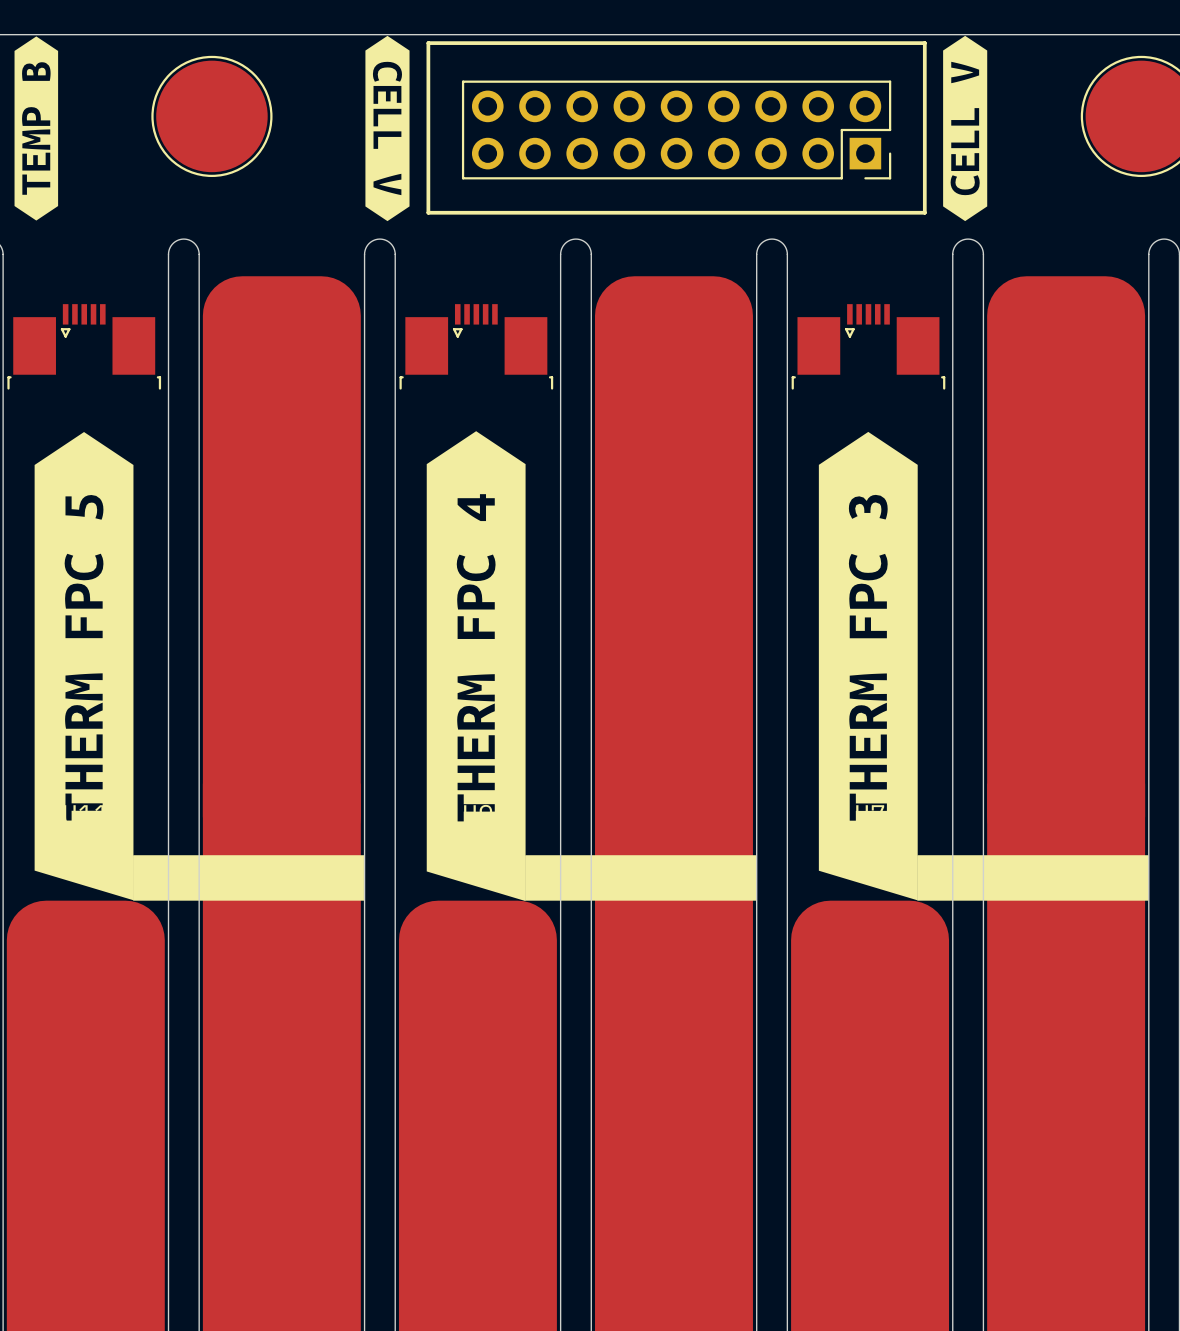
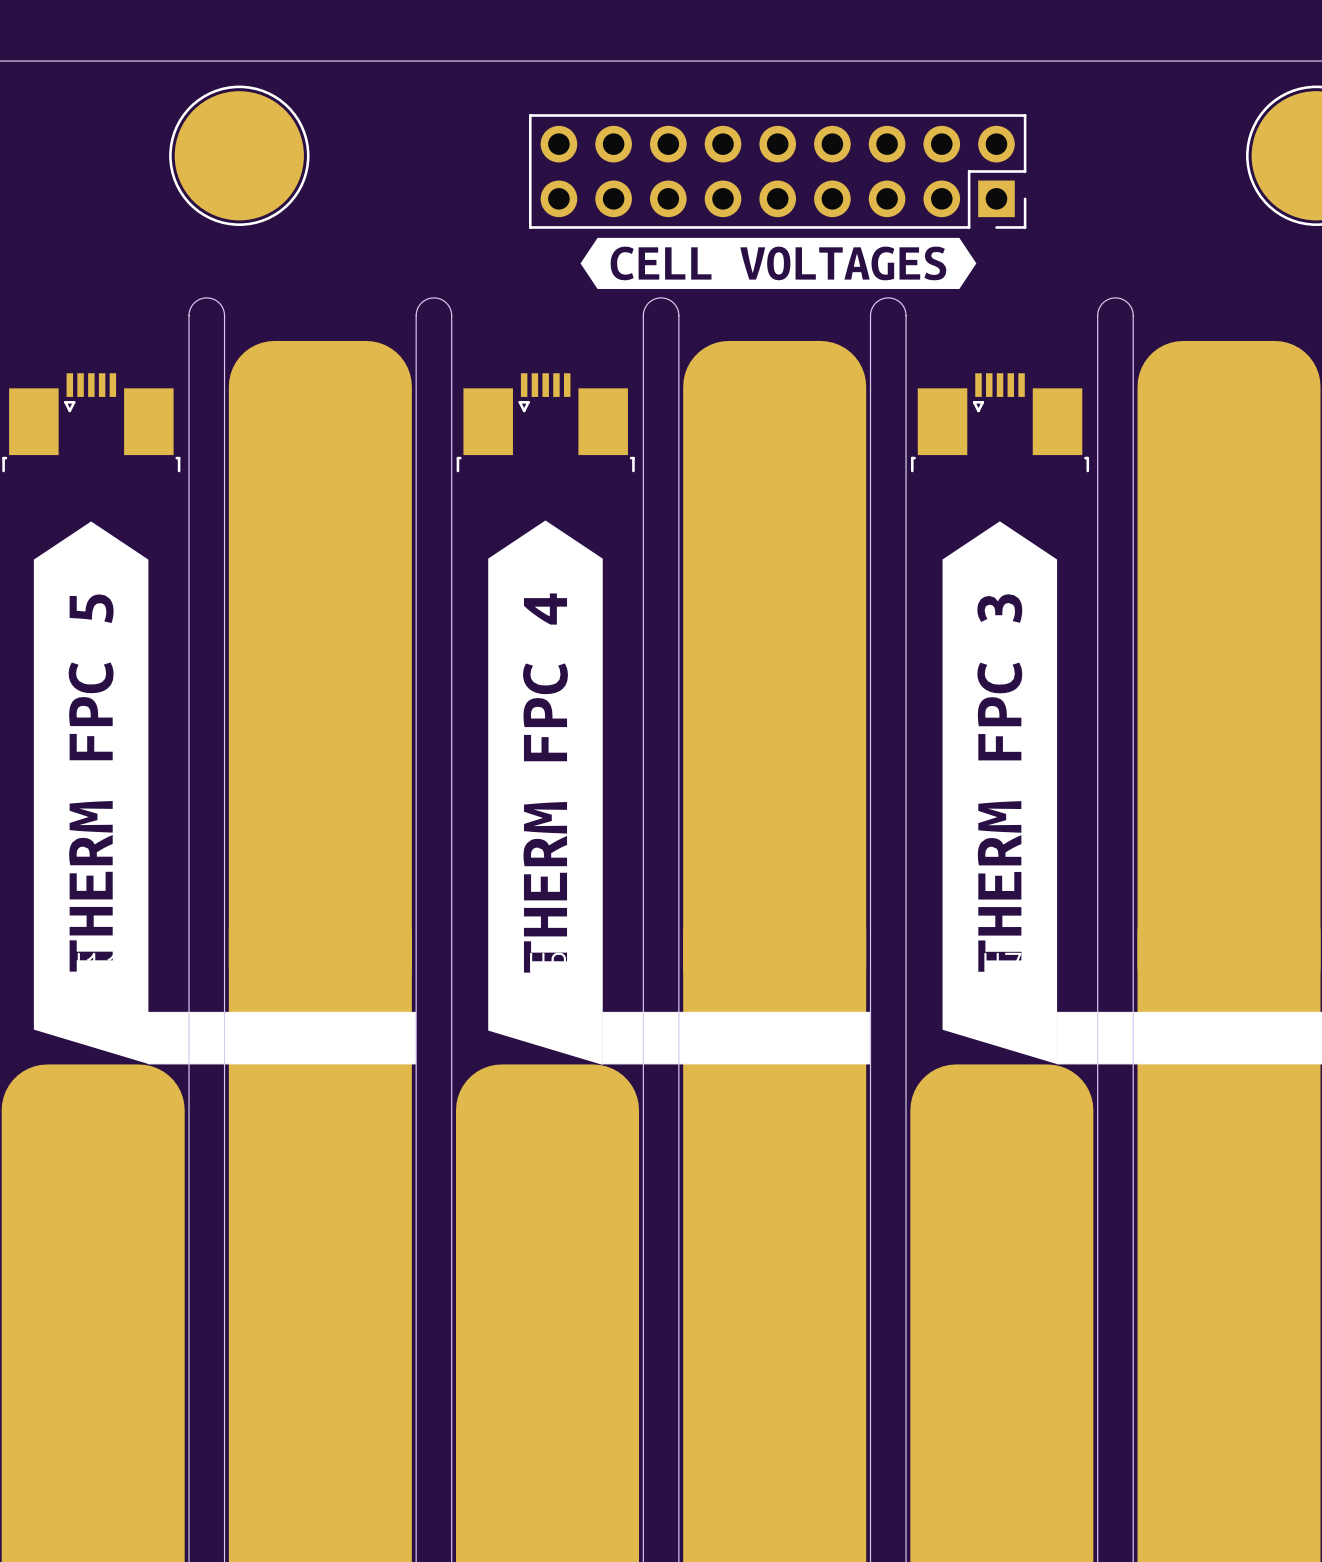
drawing: [365, 35, 410, 222] -> none
drawing: [943, 35, 988, 222] -> none
drawing: [14, 36, 59, 221] -> none
line: (428, 43) (924, 43) (924, 212) (428, 212) (428, 43) -> none
drawing: none -> [580, 237, 977, 289]

